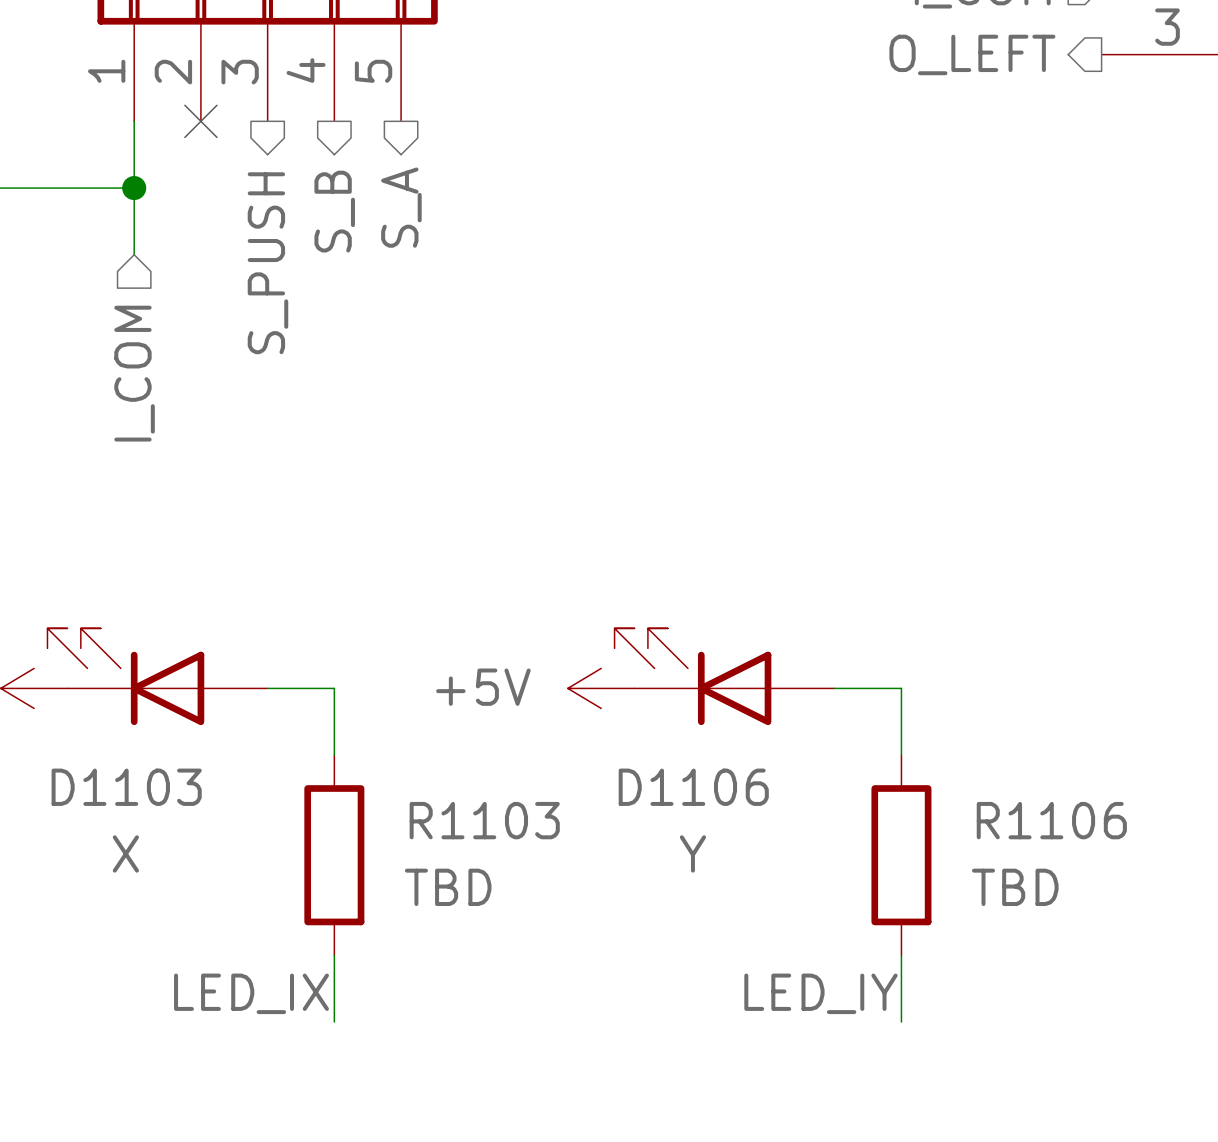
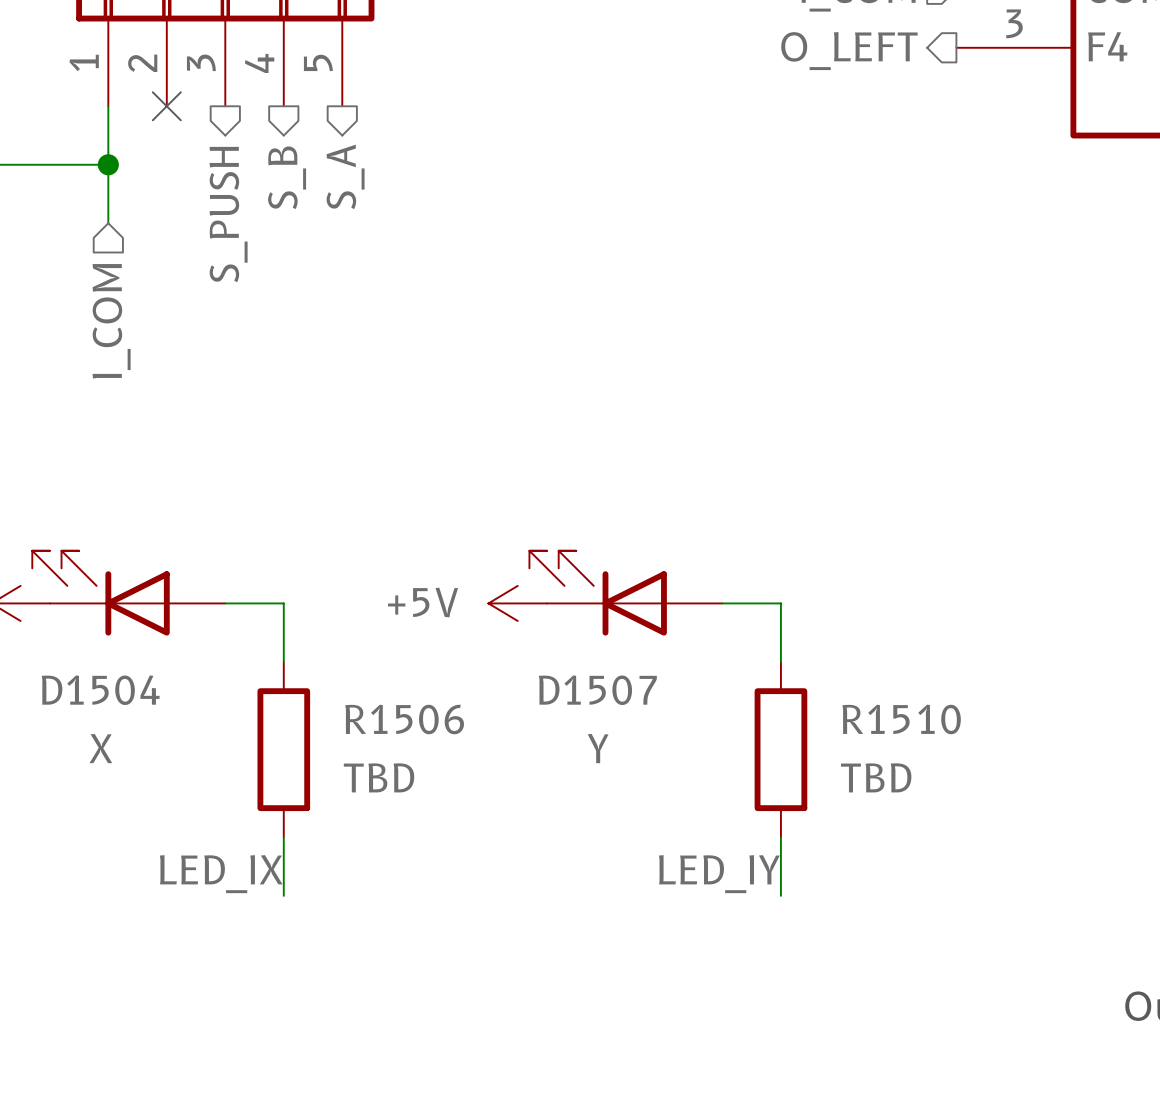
D1103 name: D1103 (126, 787) -> D1504 (100, 690)
D1106 name: D1106 (693, 787) -> D1507 (597, 690)
R1103 name: R1103 (484, 820) -> R1506 (404, 719)
R1106 name: R1106 (1051, 820) -> R1510 (901, 719)

